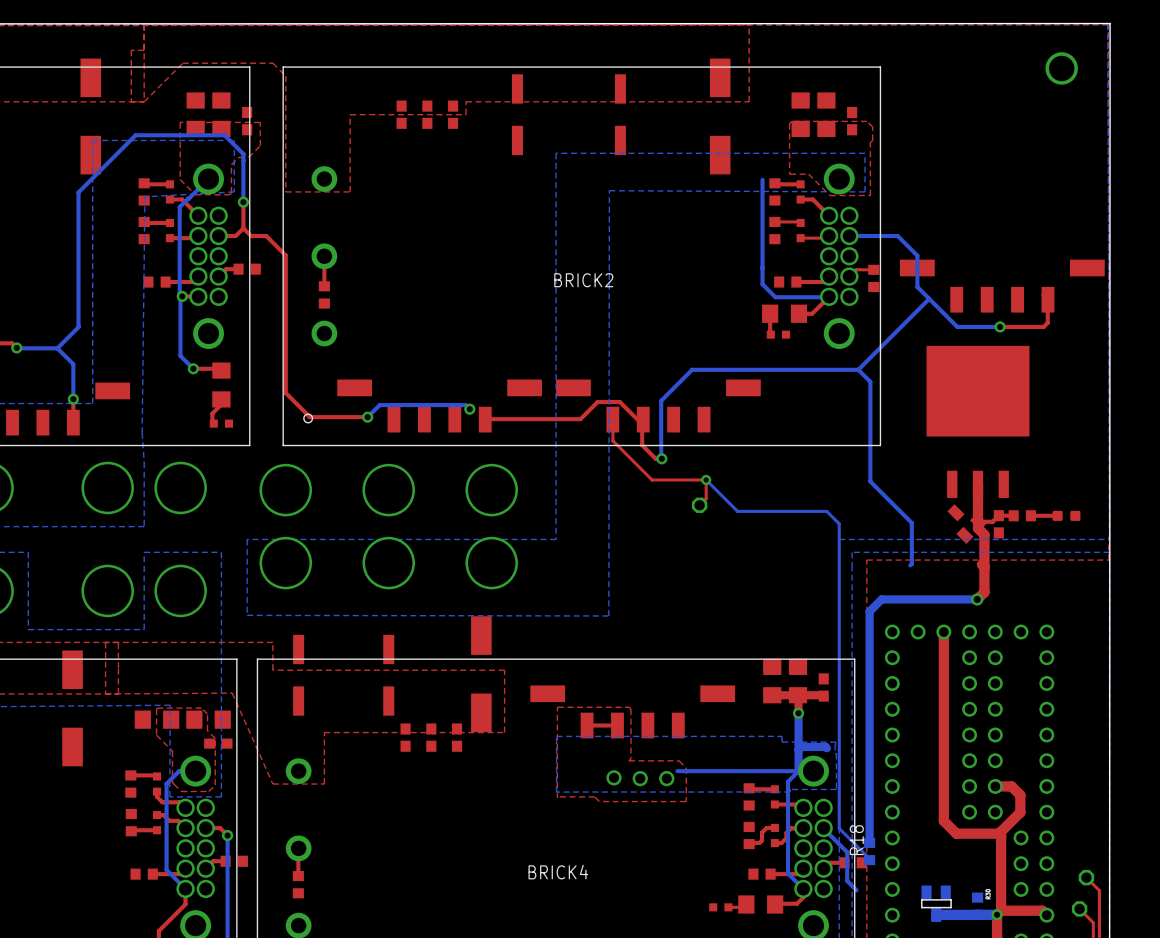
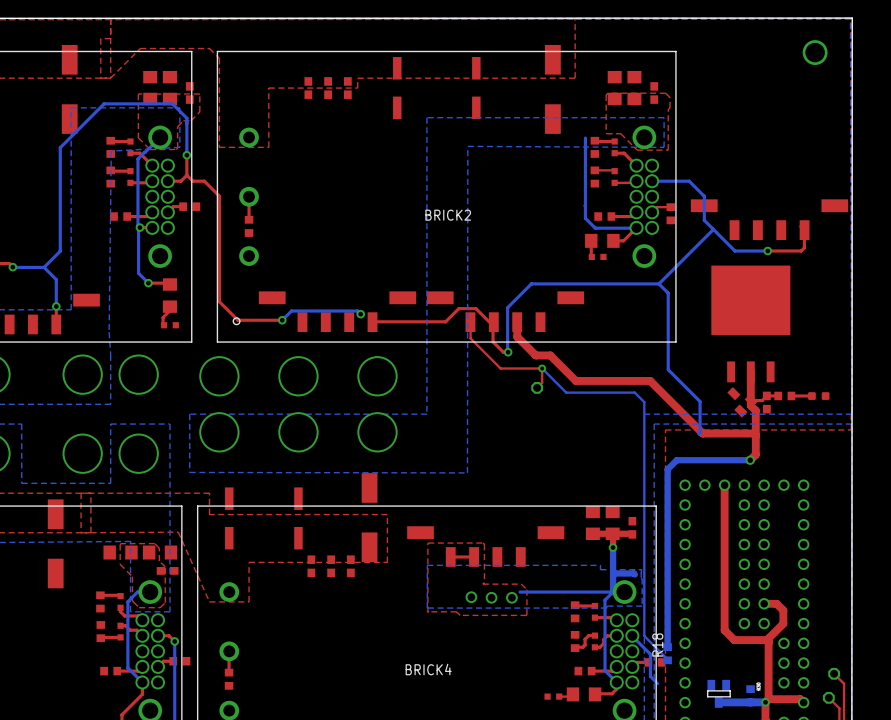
top track: none -> (517, 322) (517, 336) (536, 355) (550, 355) (575, 380) (650, 380) (702, 433) (753, 433)

